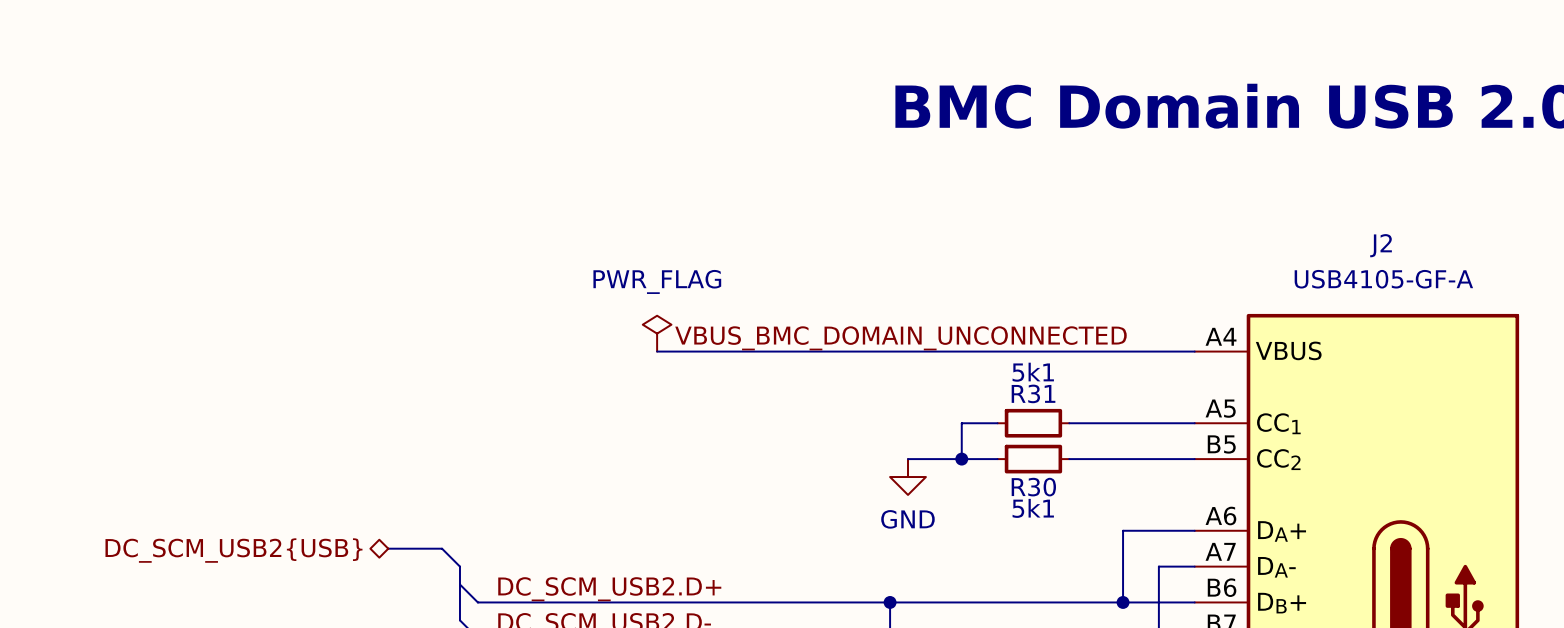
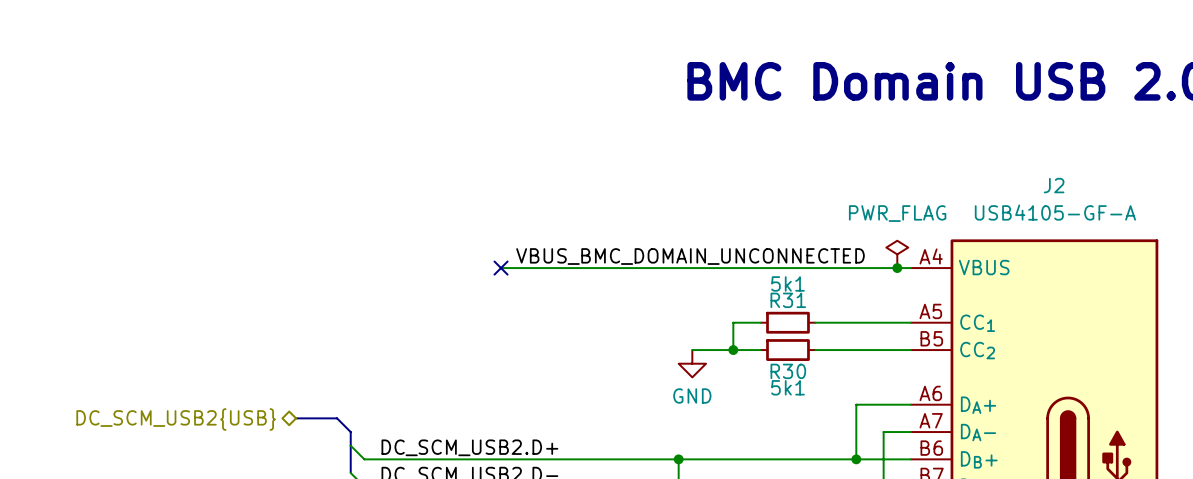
power symbol: PWR_FLAG (657, 333) -> none
power symbol: none -> PWR_FLAG (897, 254)
no-connect mark: none -> (501, 268)
junction: none -> (897, 268)

